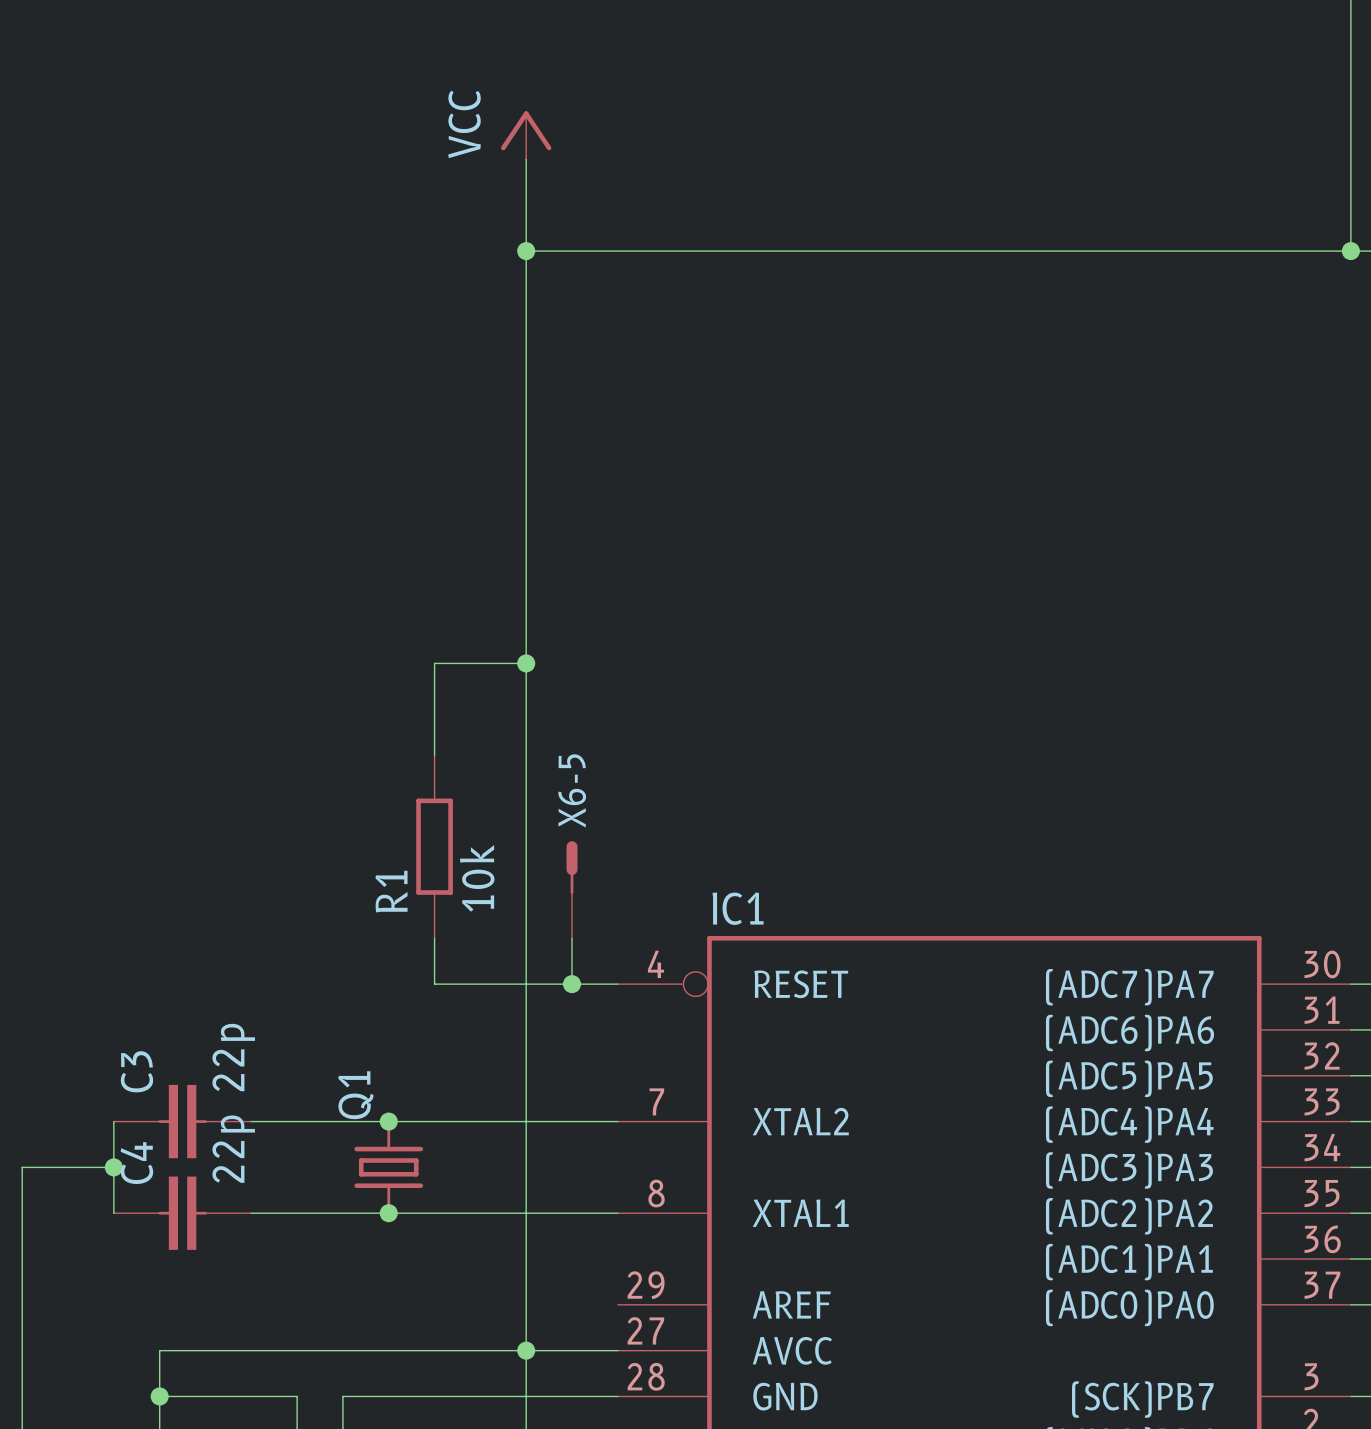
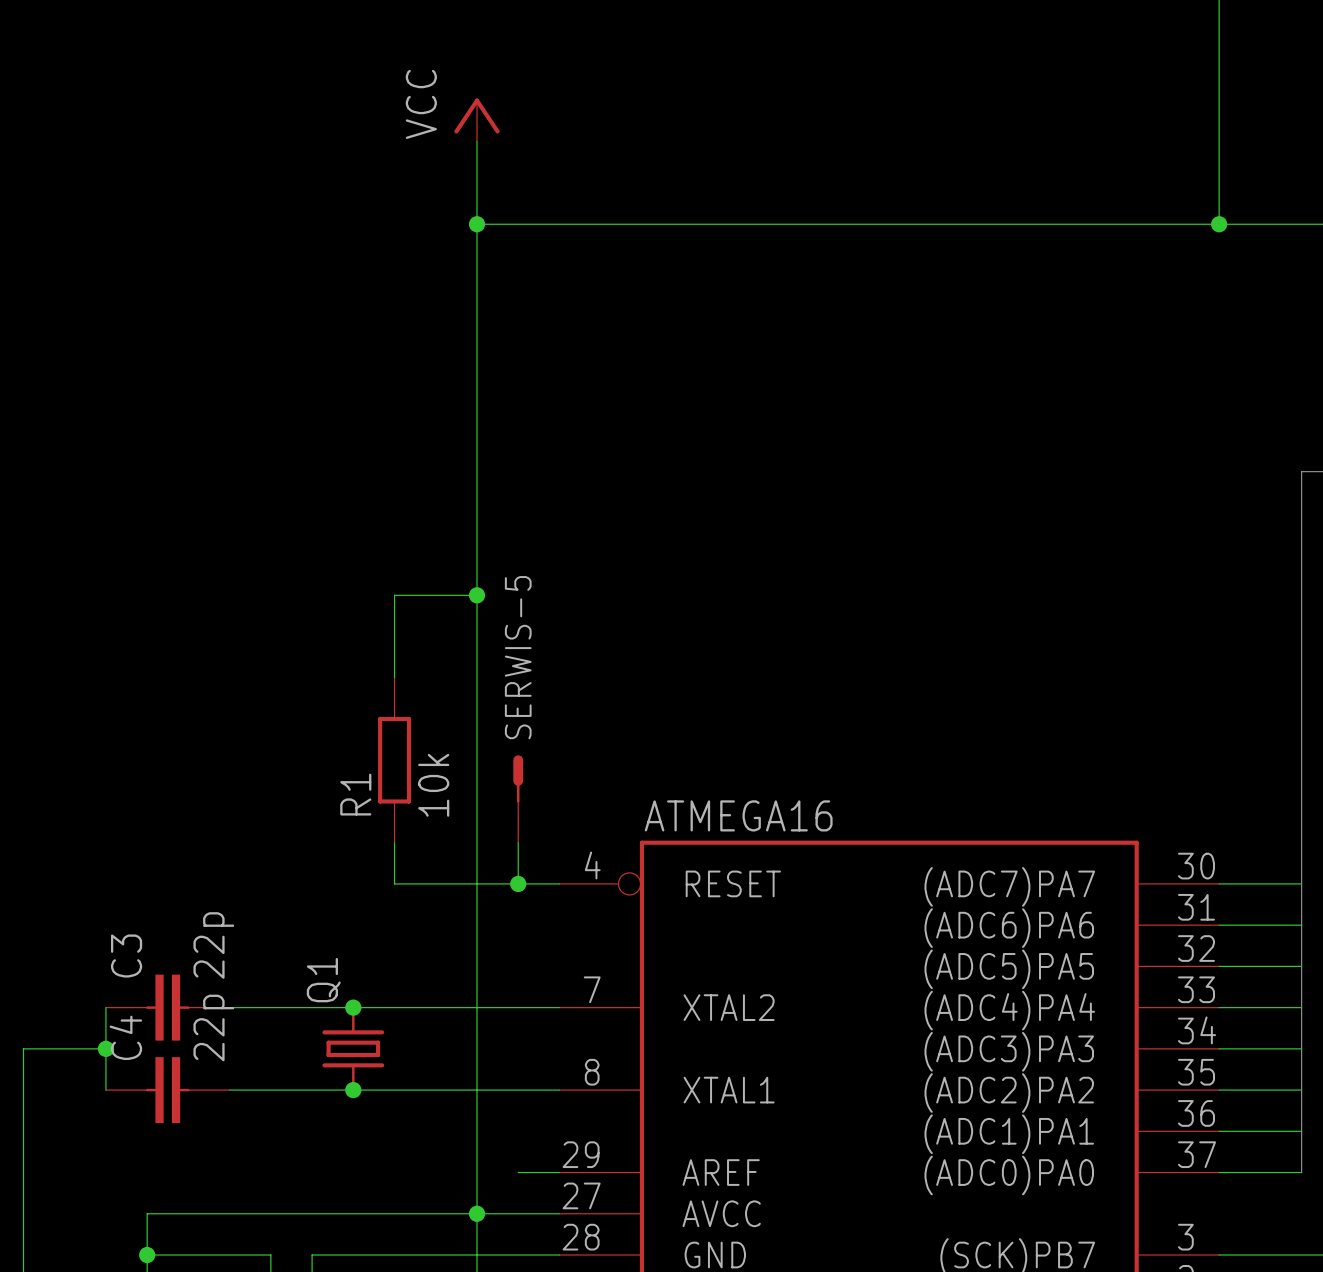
X6-5 name: X6-5 (572, 790) -> SERWIS-5 (518, 657)
IC1 name: IC1 (738, 908) -> ATMEGA16 (738, 815)
wire: none -> (518, 1172) (559, 1172)

